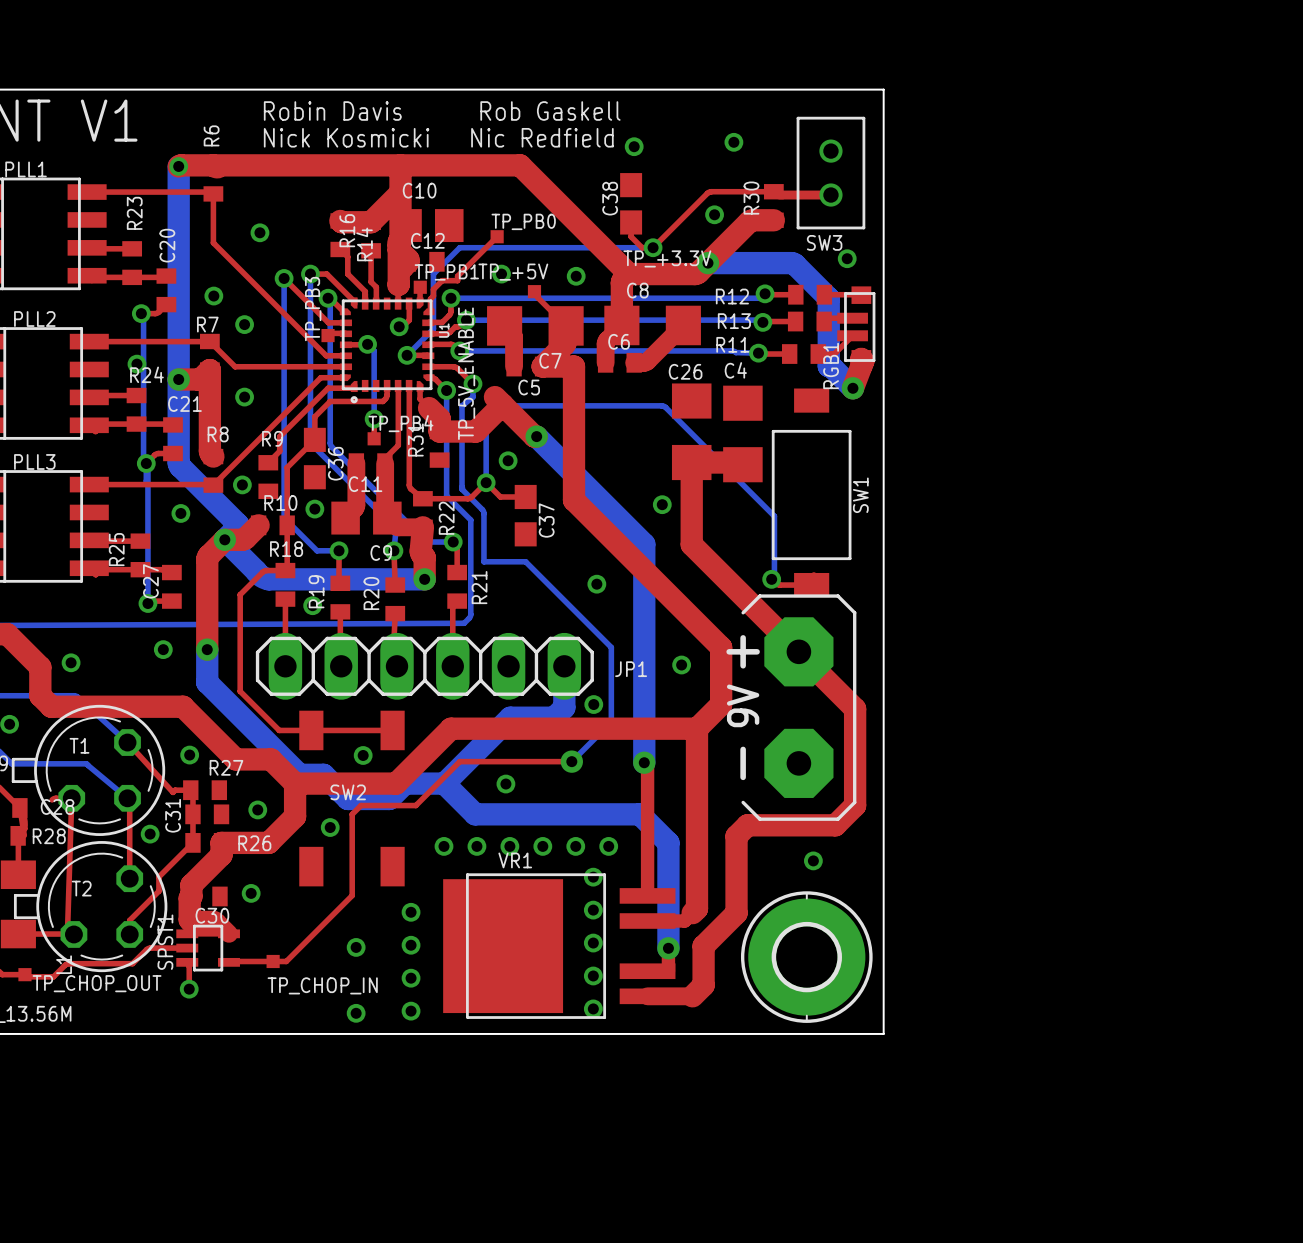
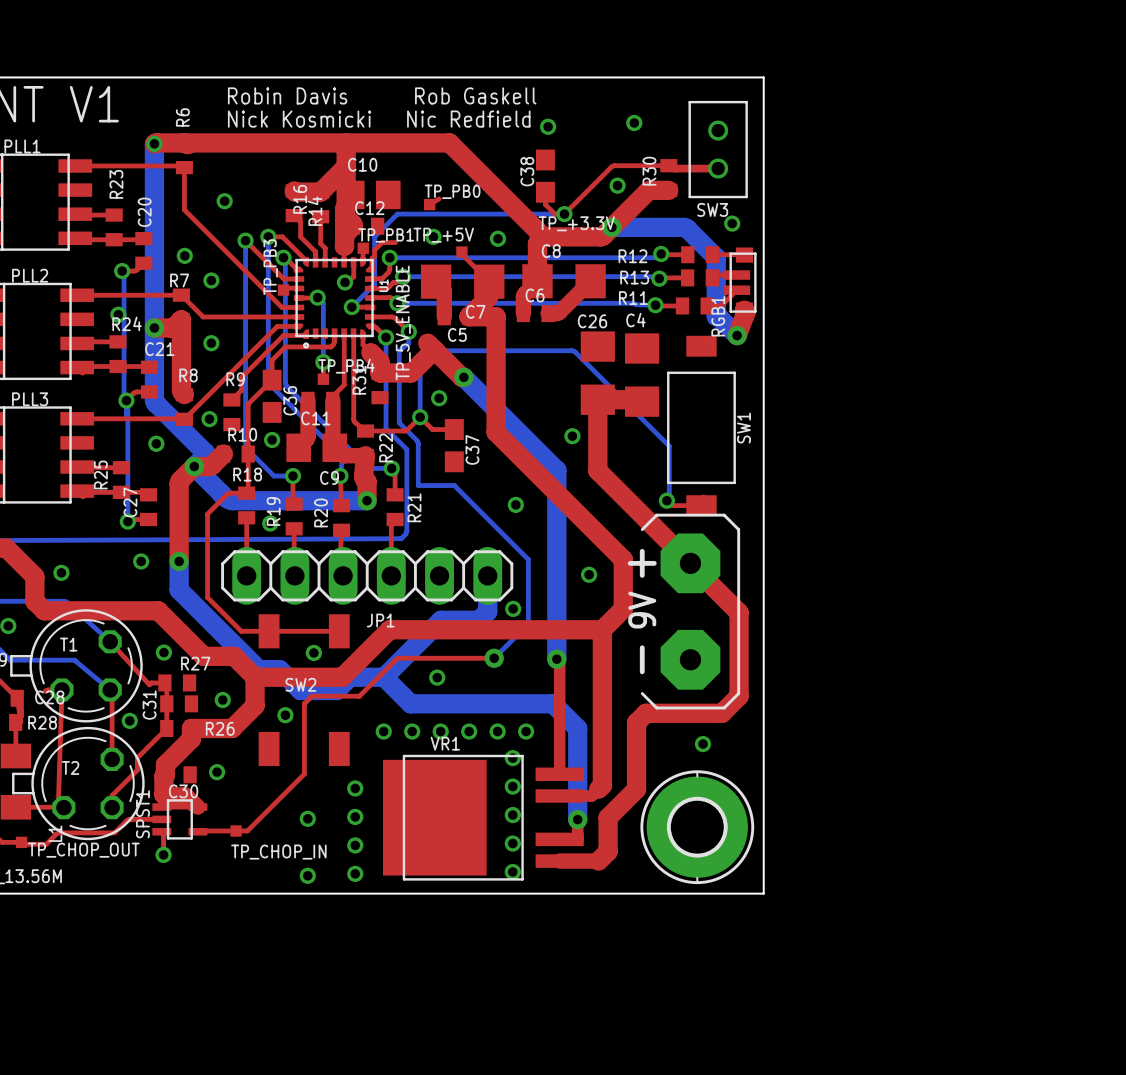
top track: (497, 236) (457, 276) (457, 280) -> (429, 204) (439, 198)
JP1 name position: JP1 (631, 669) -> JP1 (380, 620)

